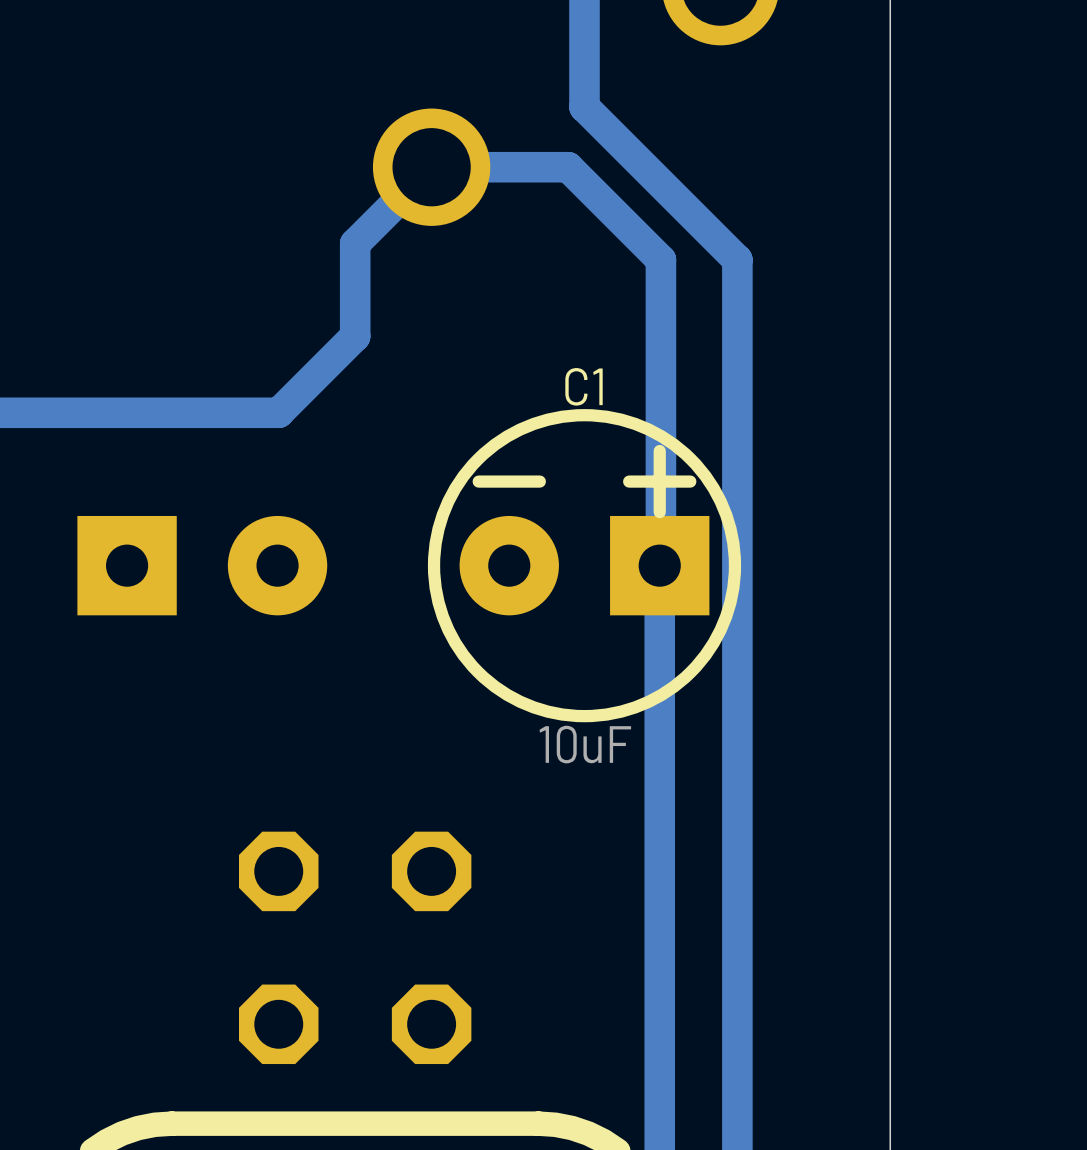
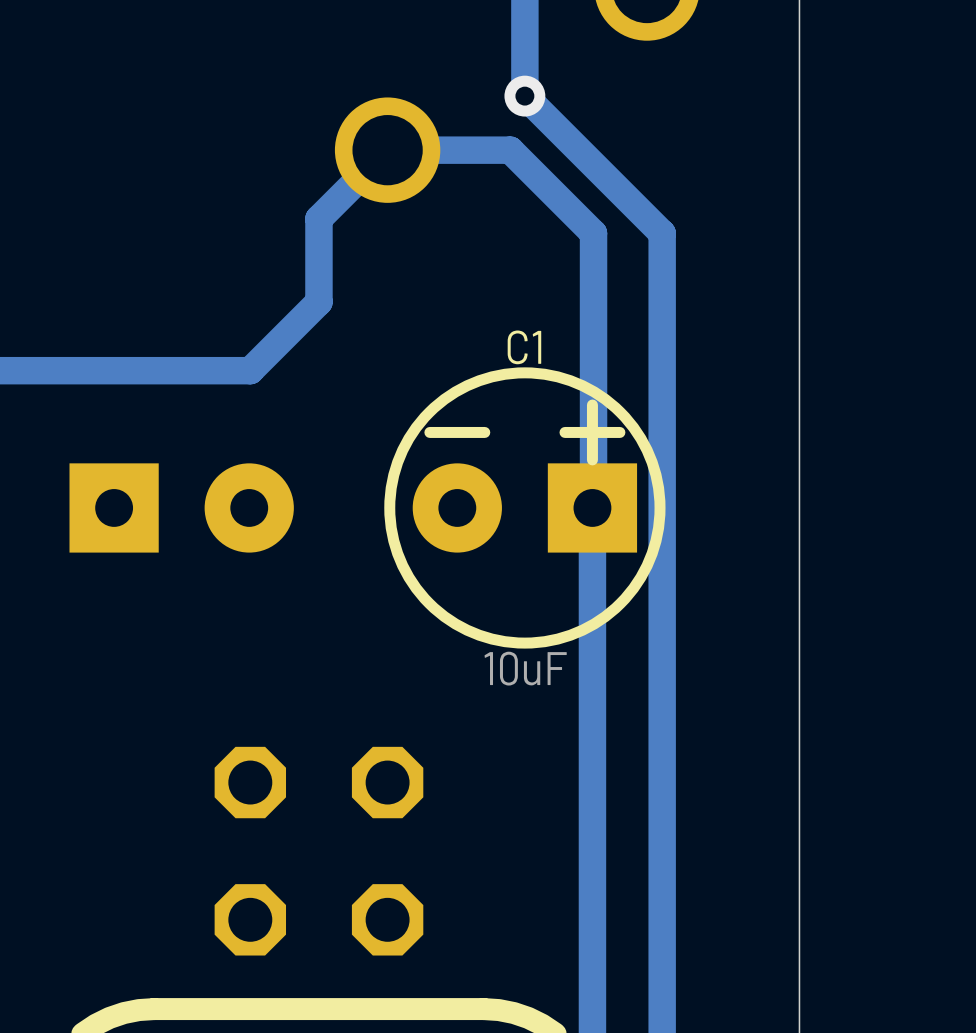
via: none -> (524, 96)

